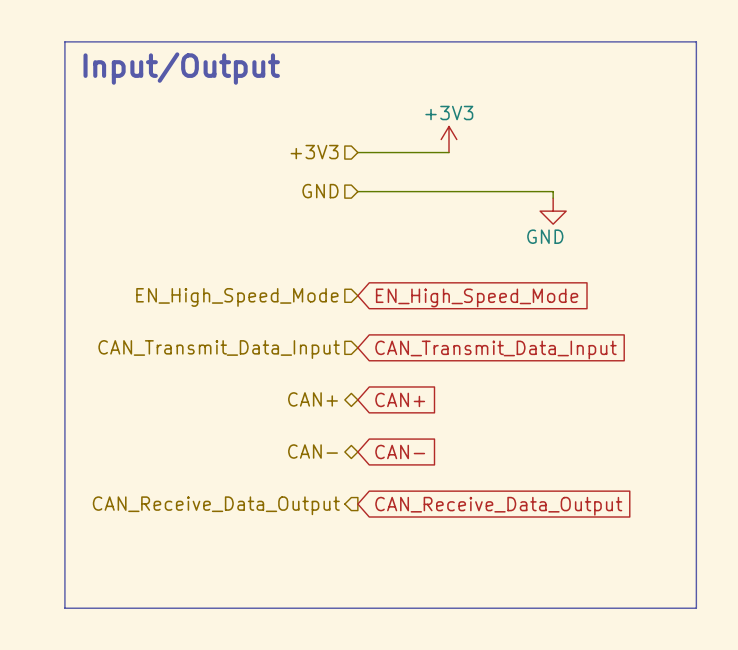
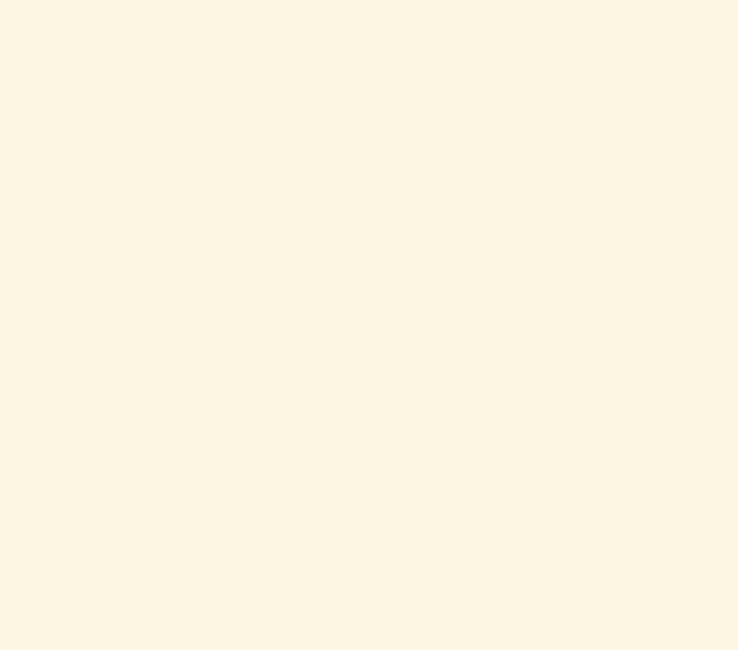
line: (64, 41) (696, 41) (696, 608) (64, 608) (64, 41) -> none
text: Input/Output (181, 68) -> none
power symbol: +3V3 (449, 139) -> none
hierarchical label: +3V3 (314, 152) -> none
wire: (357, 152) (449, 152) -> none
hierarchical label: GND (320, 191) -> none
wire: (357, 191) (553, 191) (553, 198) -> none
power symbol: GND (553, 211) -> none
hierarchical label: EN_High_Speed_Mode (237, 297) -> none
global label: EN_High_Speed_Mode (477, 297) -> none
hierarchical label: CAN_Transmit_Data_Input (219, 349) -> none
global label: CAN_Transmit_Data_Input (495, 350) -> none
hierarchical label: CAN+ (313, 399) -> none
global label: CAN+ (400, 399) -> none
hierarchical label: CAN- (313, 451) -> none
global label: CAN- (400, 451) -> none
hierarchical label: CAN_Receive_Data_Output (216, 505) -> none
global label: CAN_Receive_Data_Output (498, 506) -> none

